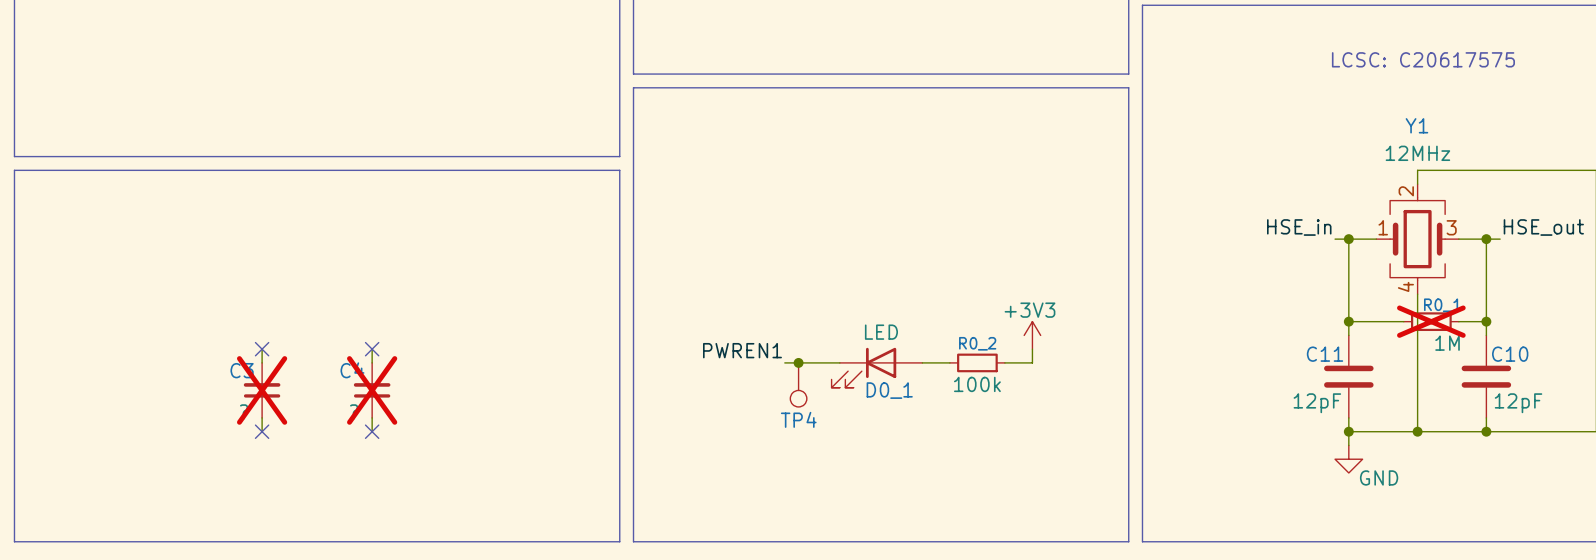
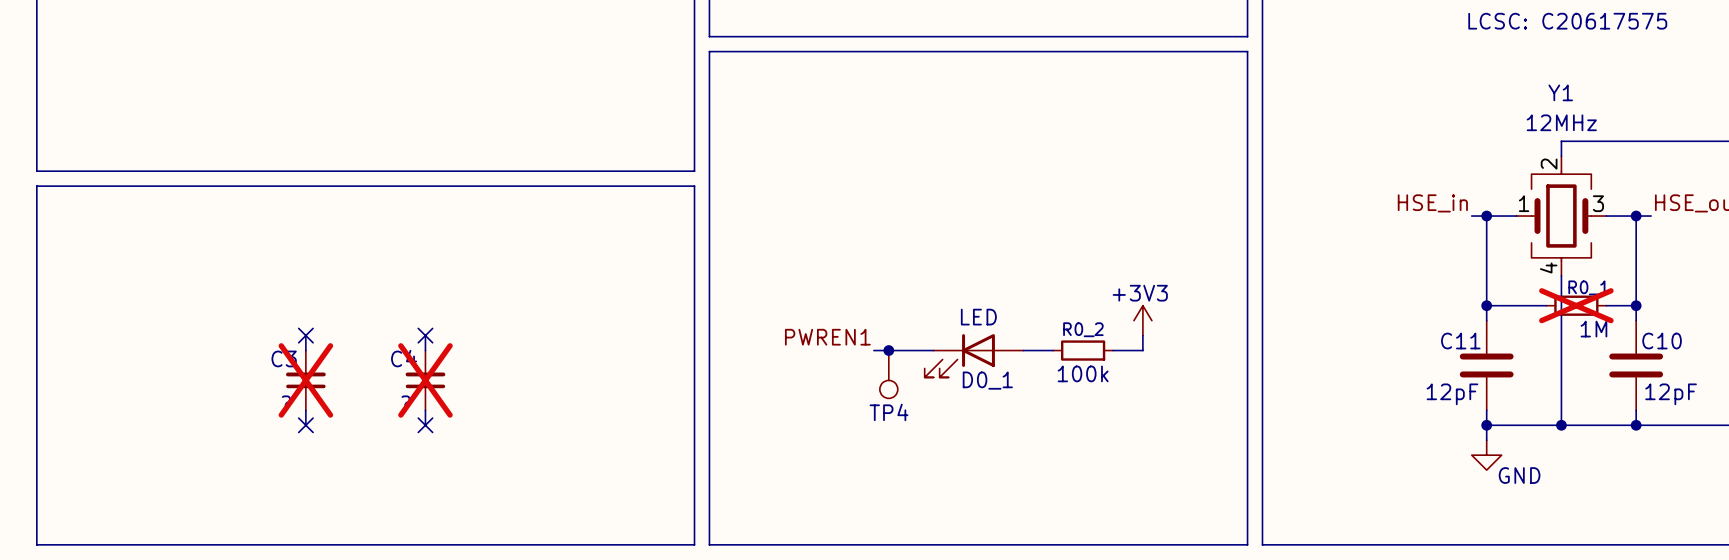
line: (14, 156) (619, 156) -> (36, 126) (36, 141)
line: (14, 170) (619, 170) -> (694, 126) (694, 141)
line: (14, 197) (14, 211) -> (36, 171) (694, 171)
line: (619, 197) (619, 211) -> (36, 186) (694, 186)

